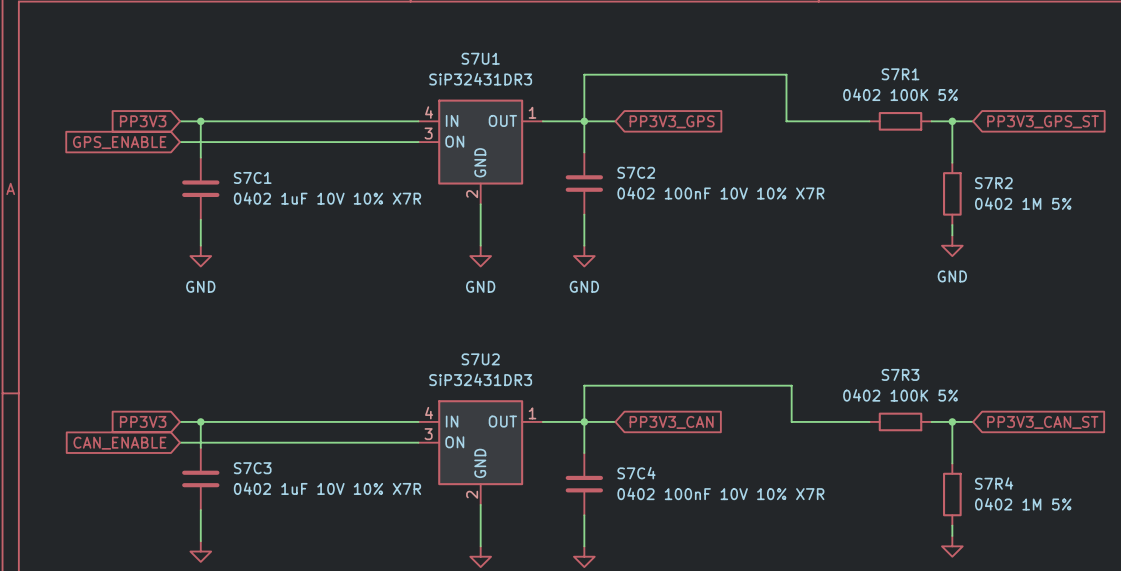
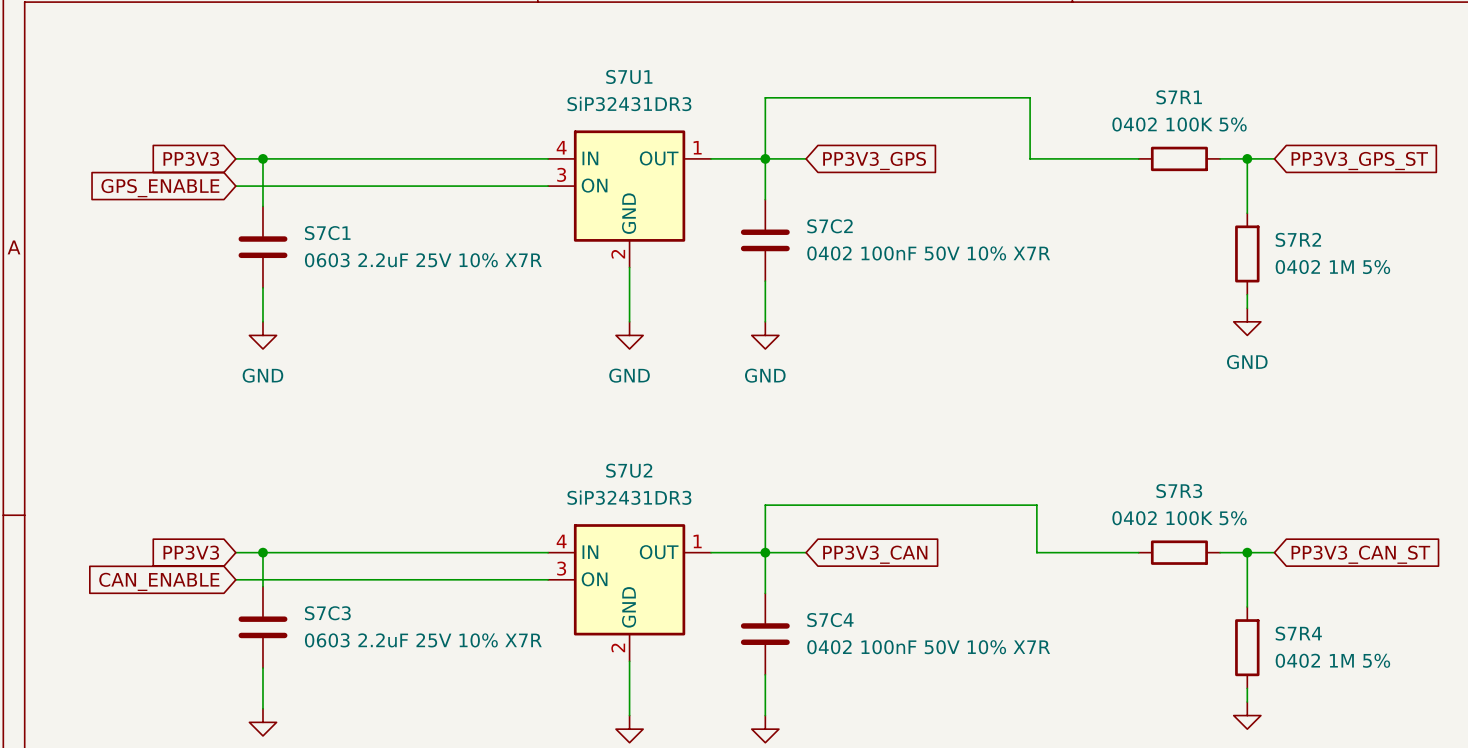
S7C2 value: 0402 100nF 10V 10% X7R (720, 193) -> 0402 100nF 50V 10% X7R (928, 253)
S7C1 value: 0402 1uF 10V 10% X7R (327, 198) -> 0603 2.2uF 25V 10% X7R (423, 260)
S7C3 value: 0402 1uF 10V 10% X7R (327, 488) -> 0603 2.2uF 25V 10% X7R (423, 640)
S7C4 value: 0402 100nF 10V 10% X7R (720, 493) -> 0402 100nF 50V 10% X7R (928, 647)

